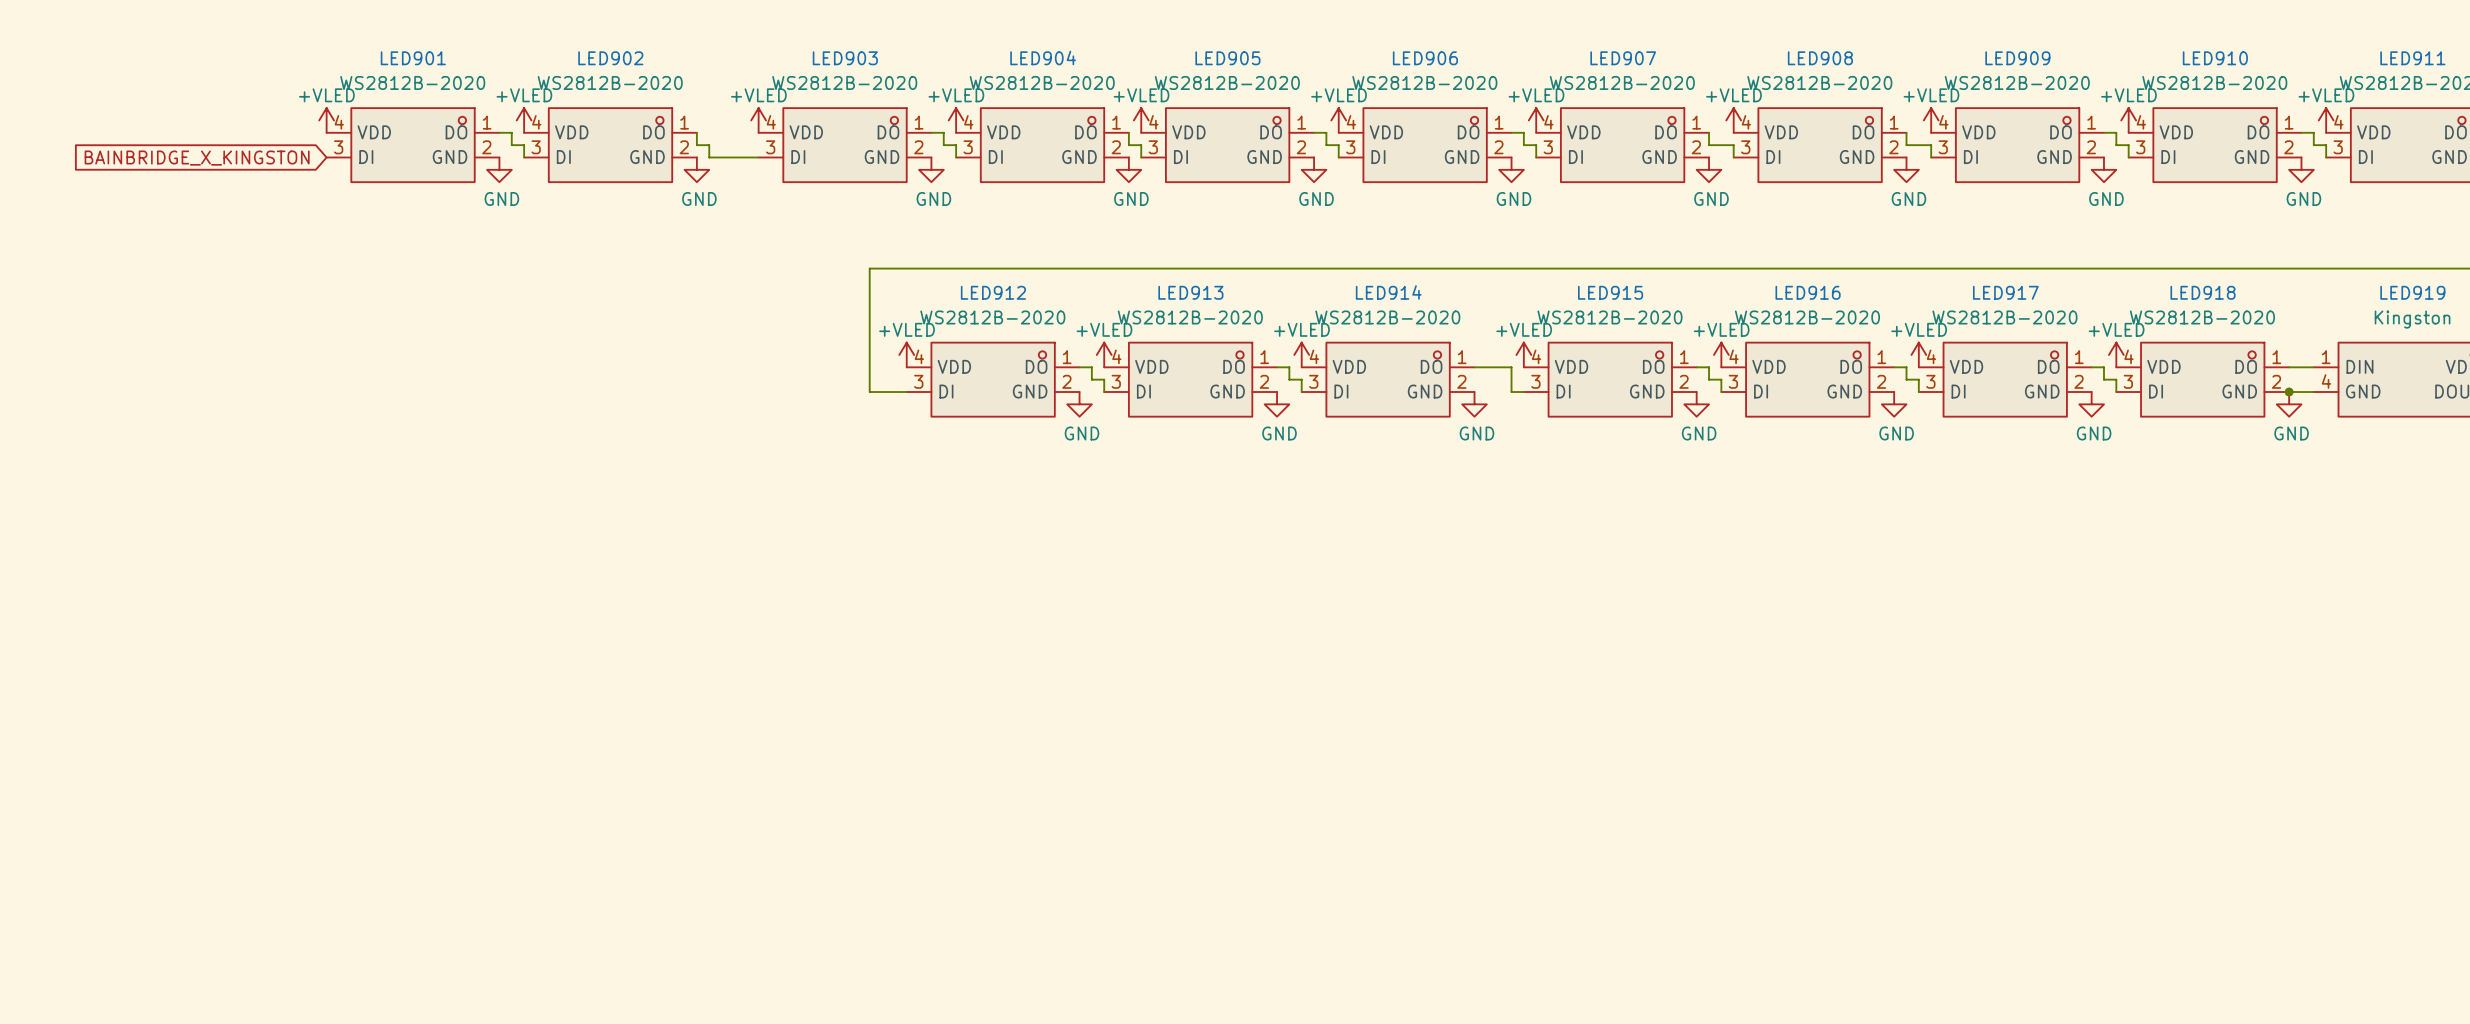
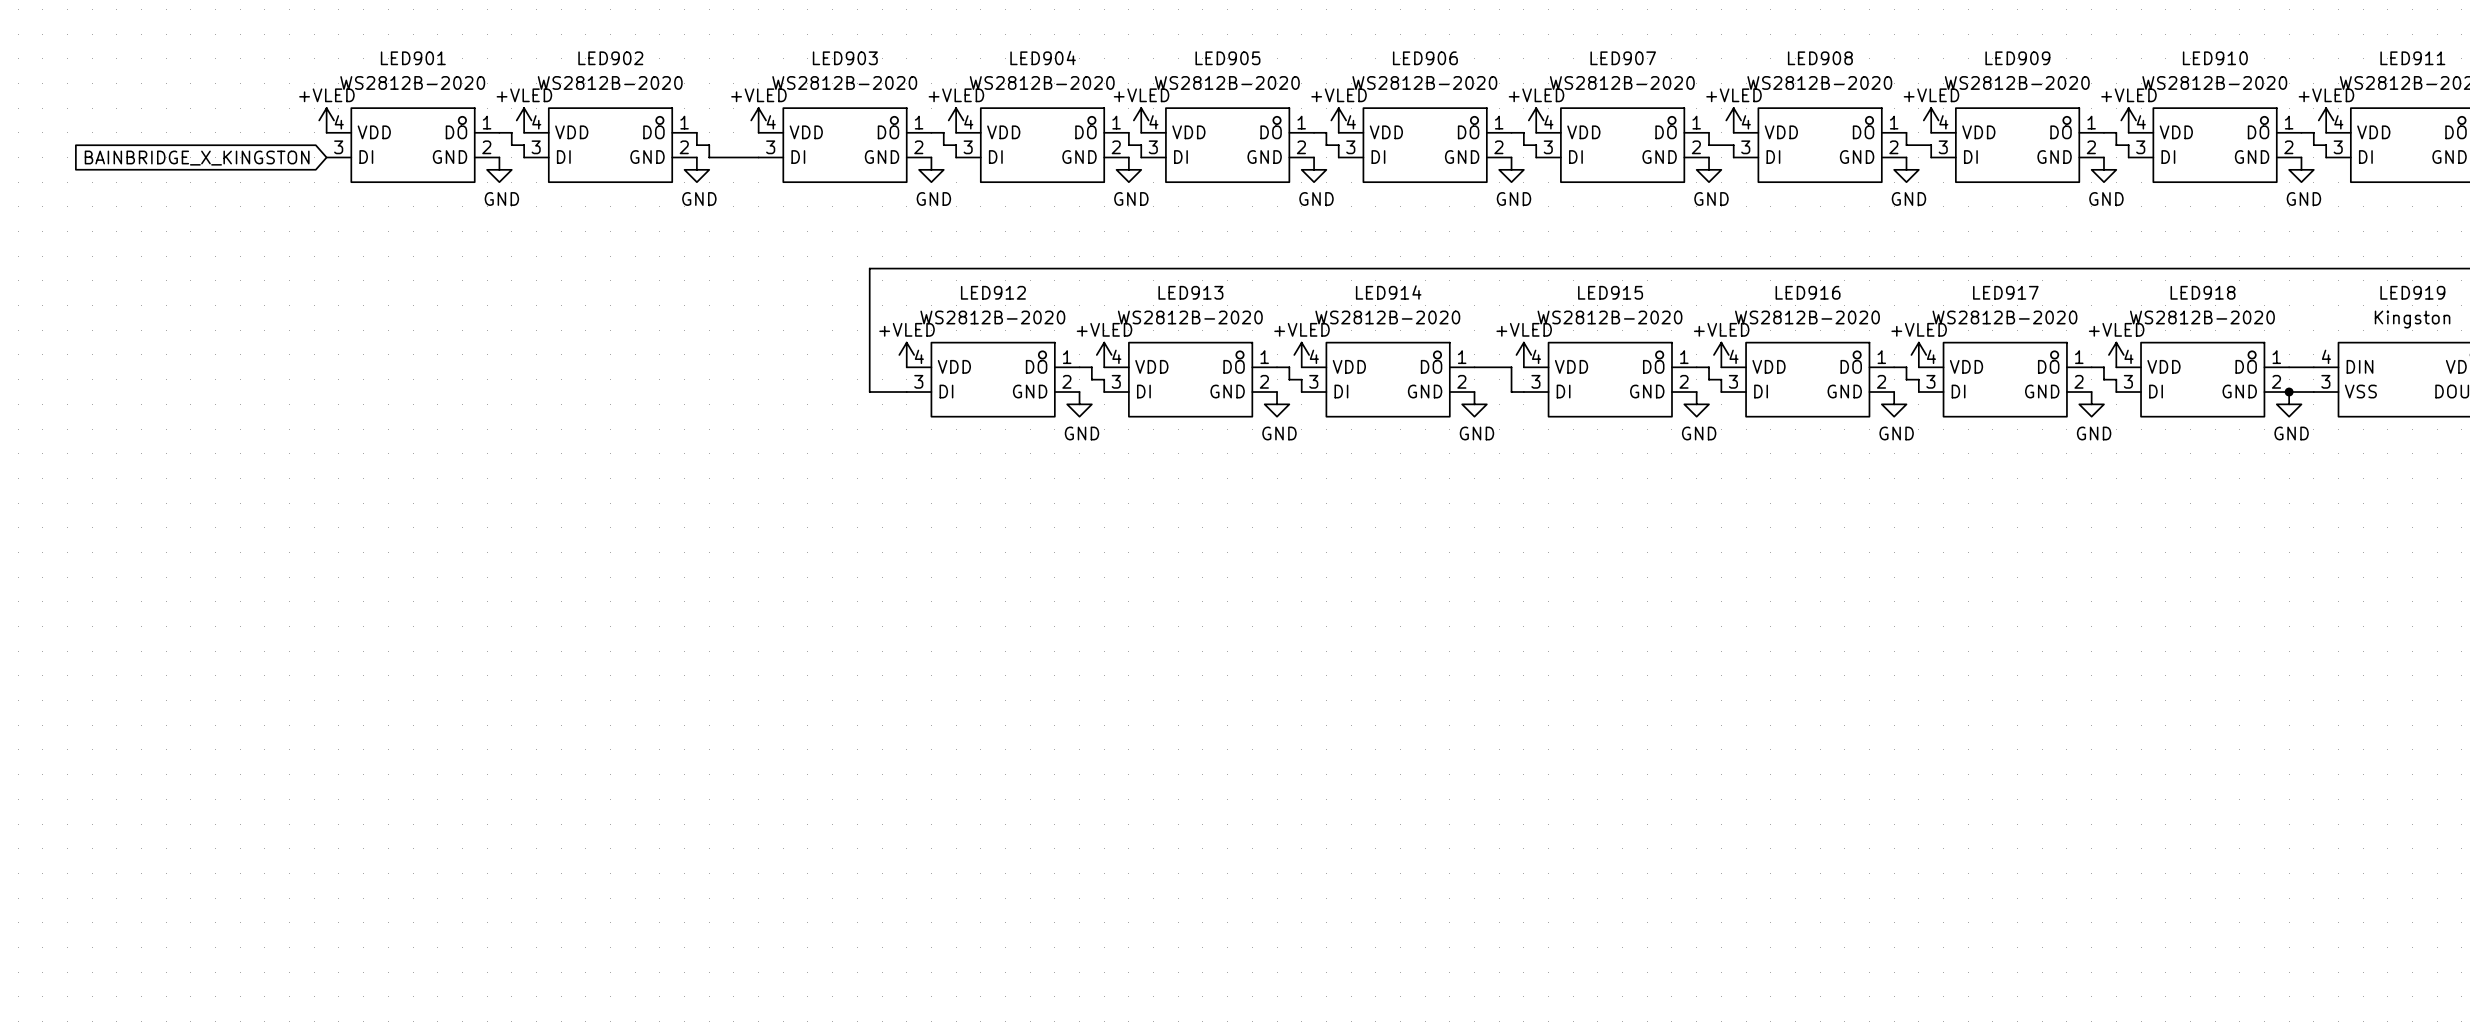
LED919 pin number: 1 (2326, 357) -> 4 (2326, 356)
LED919 pin number: 4 (2326, 381) -> 3 (2325, 381)
LED919 pin name: GND (2363, 391) -> VSS (2360, 391)

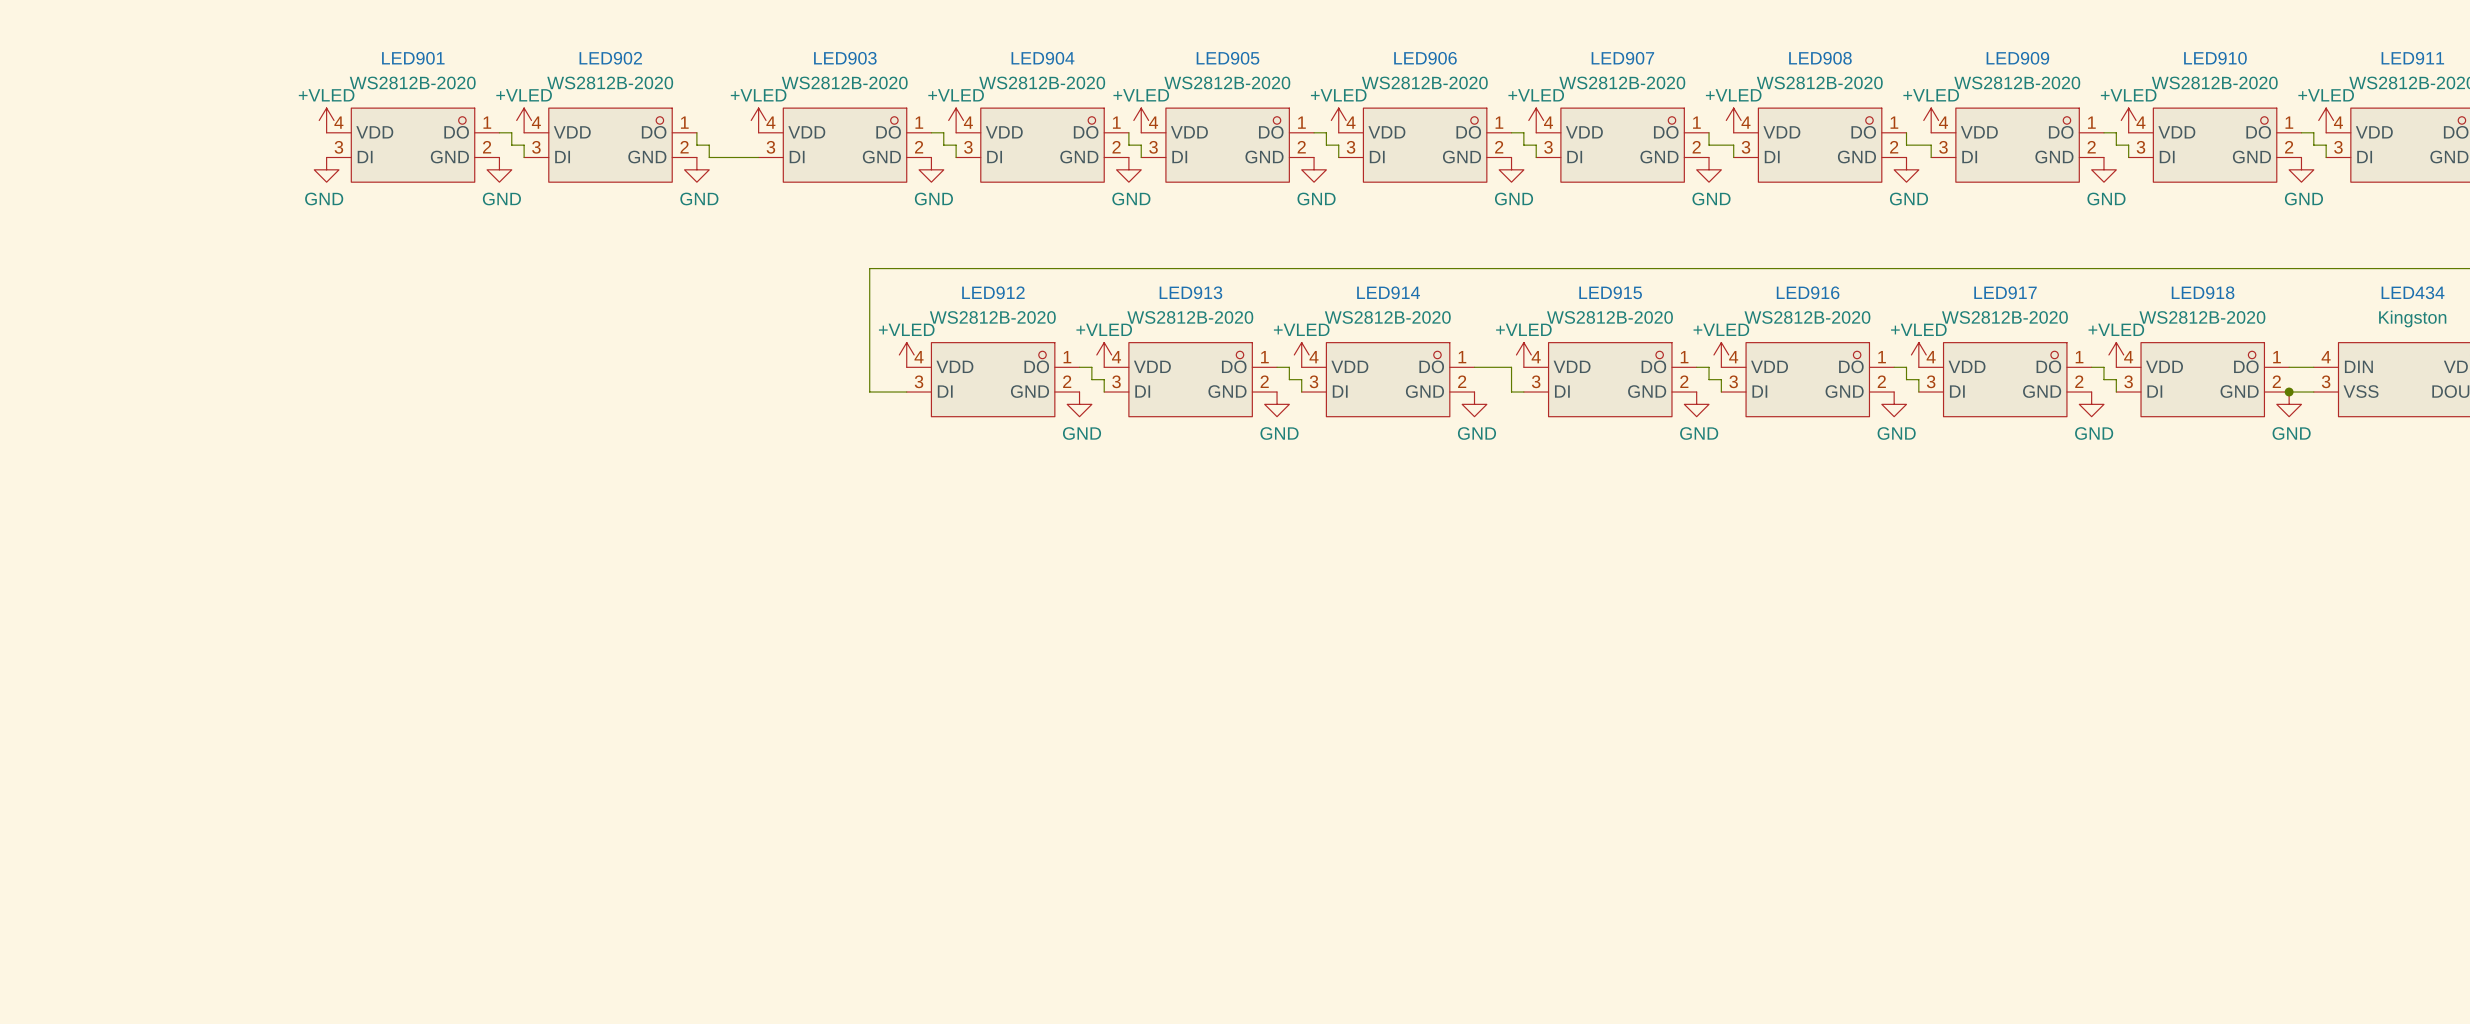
global label: BAINBRIDGE_X_KINGSTON (197, 158) -> none
power symbol: none -> GND (326, 169)
LED919 name: LED919 (2412, 292) -> LED434 (2413, 292)

